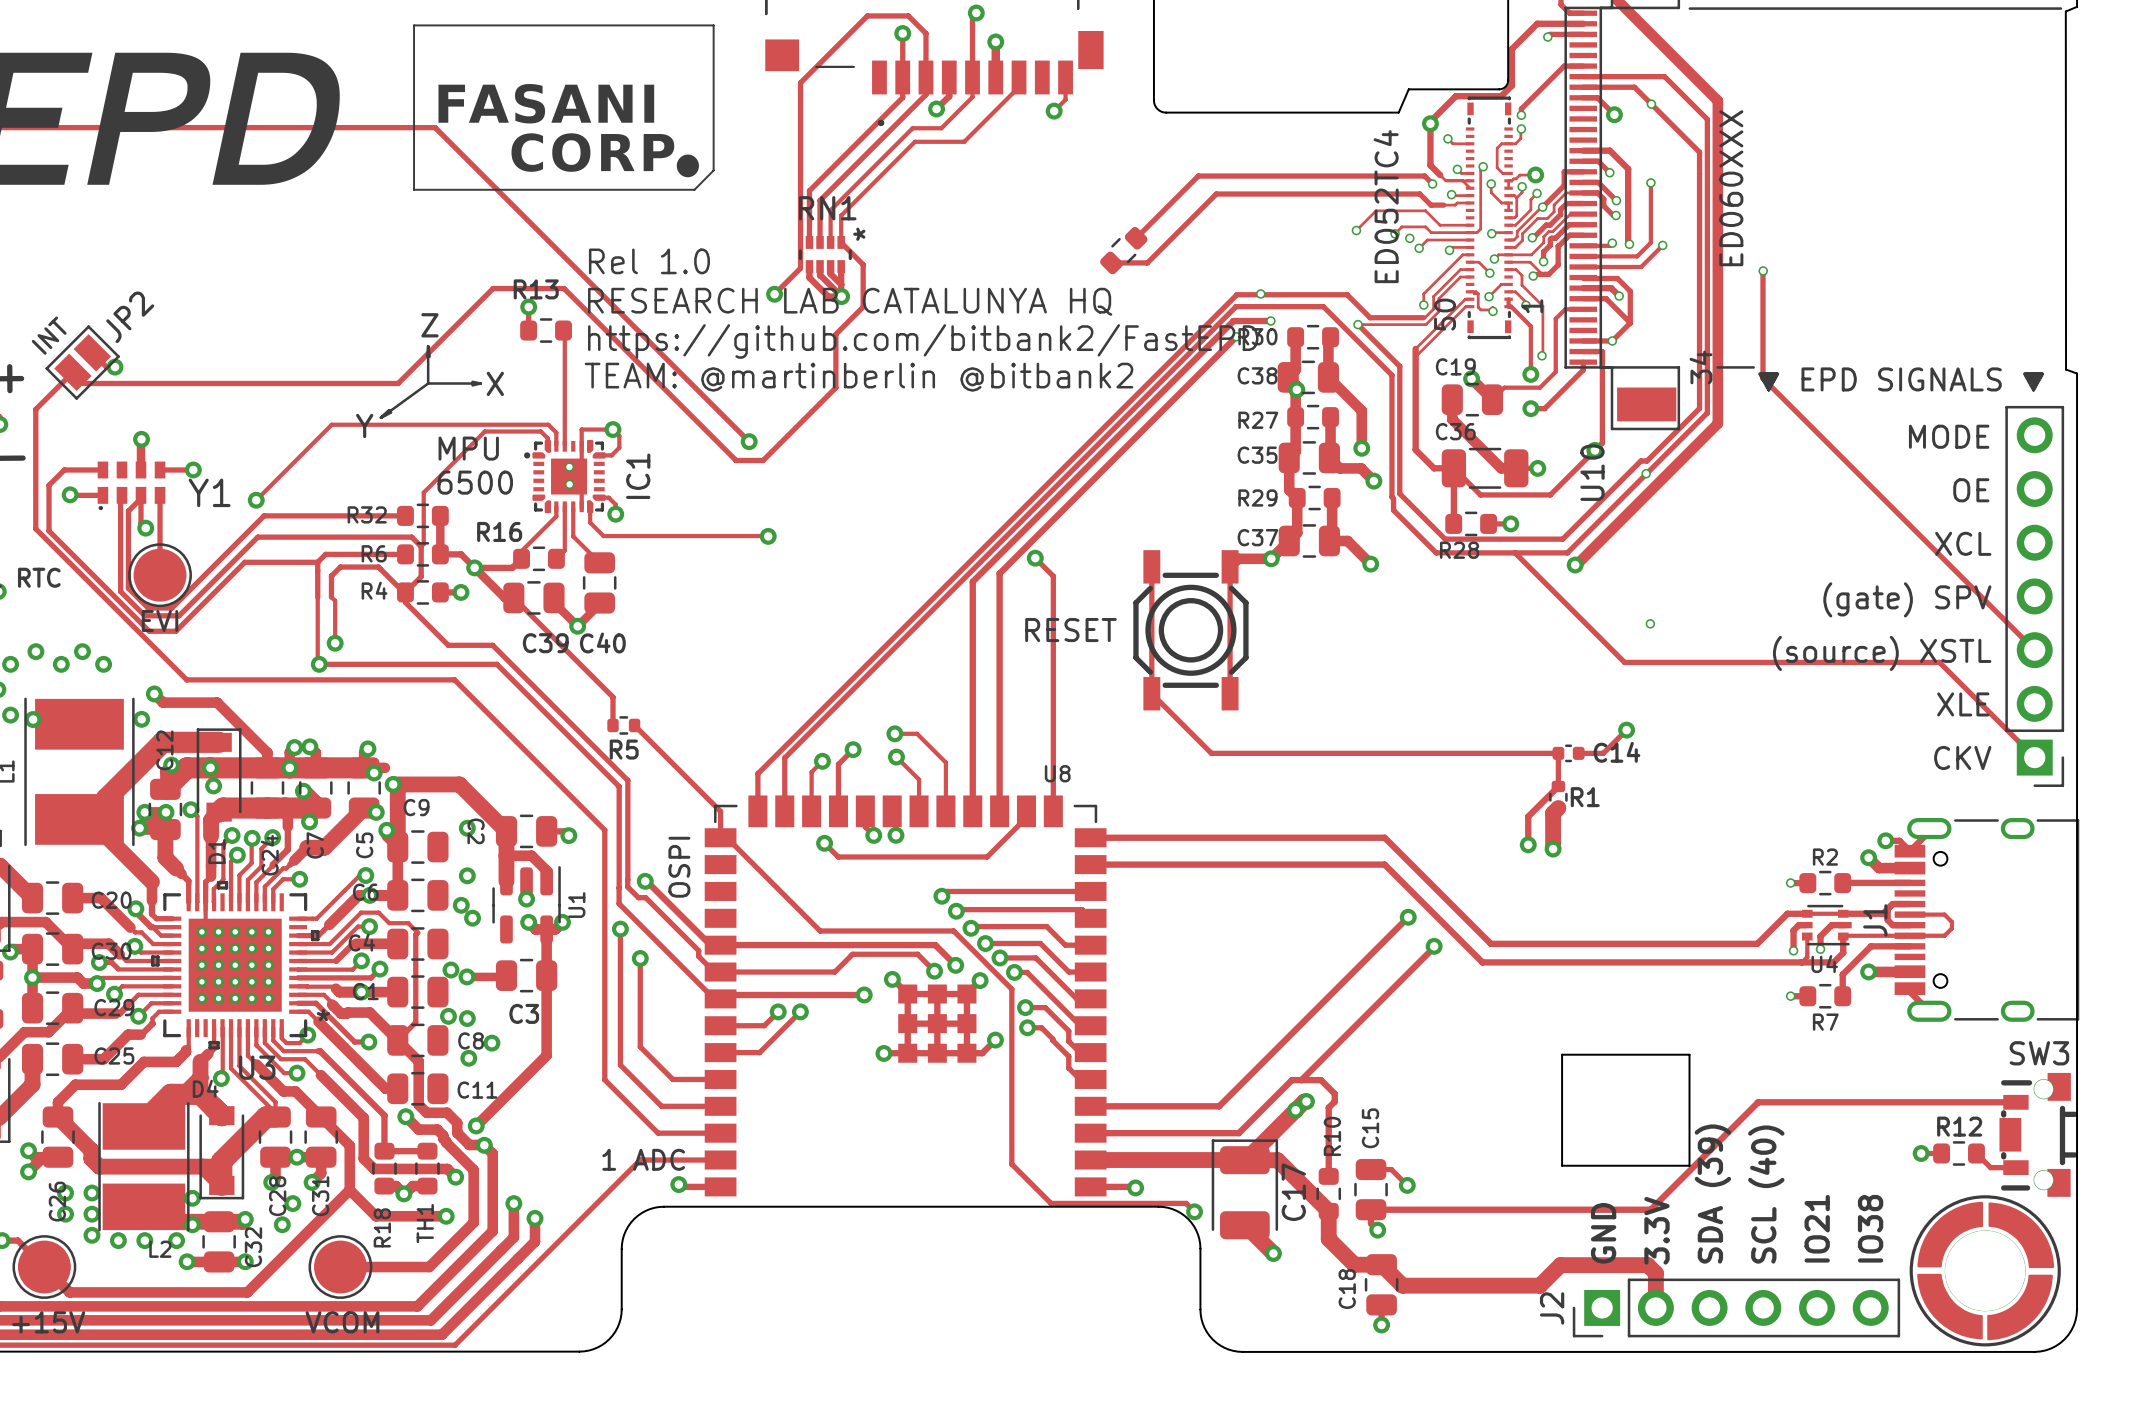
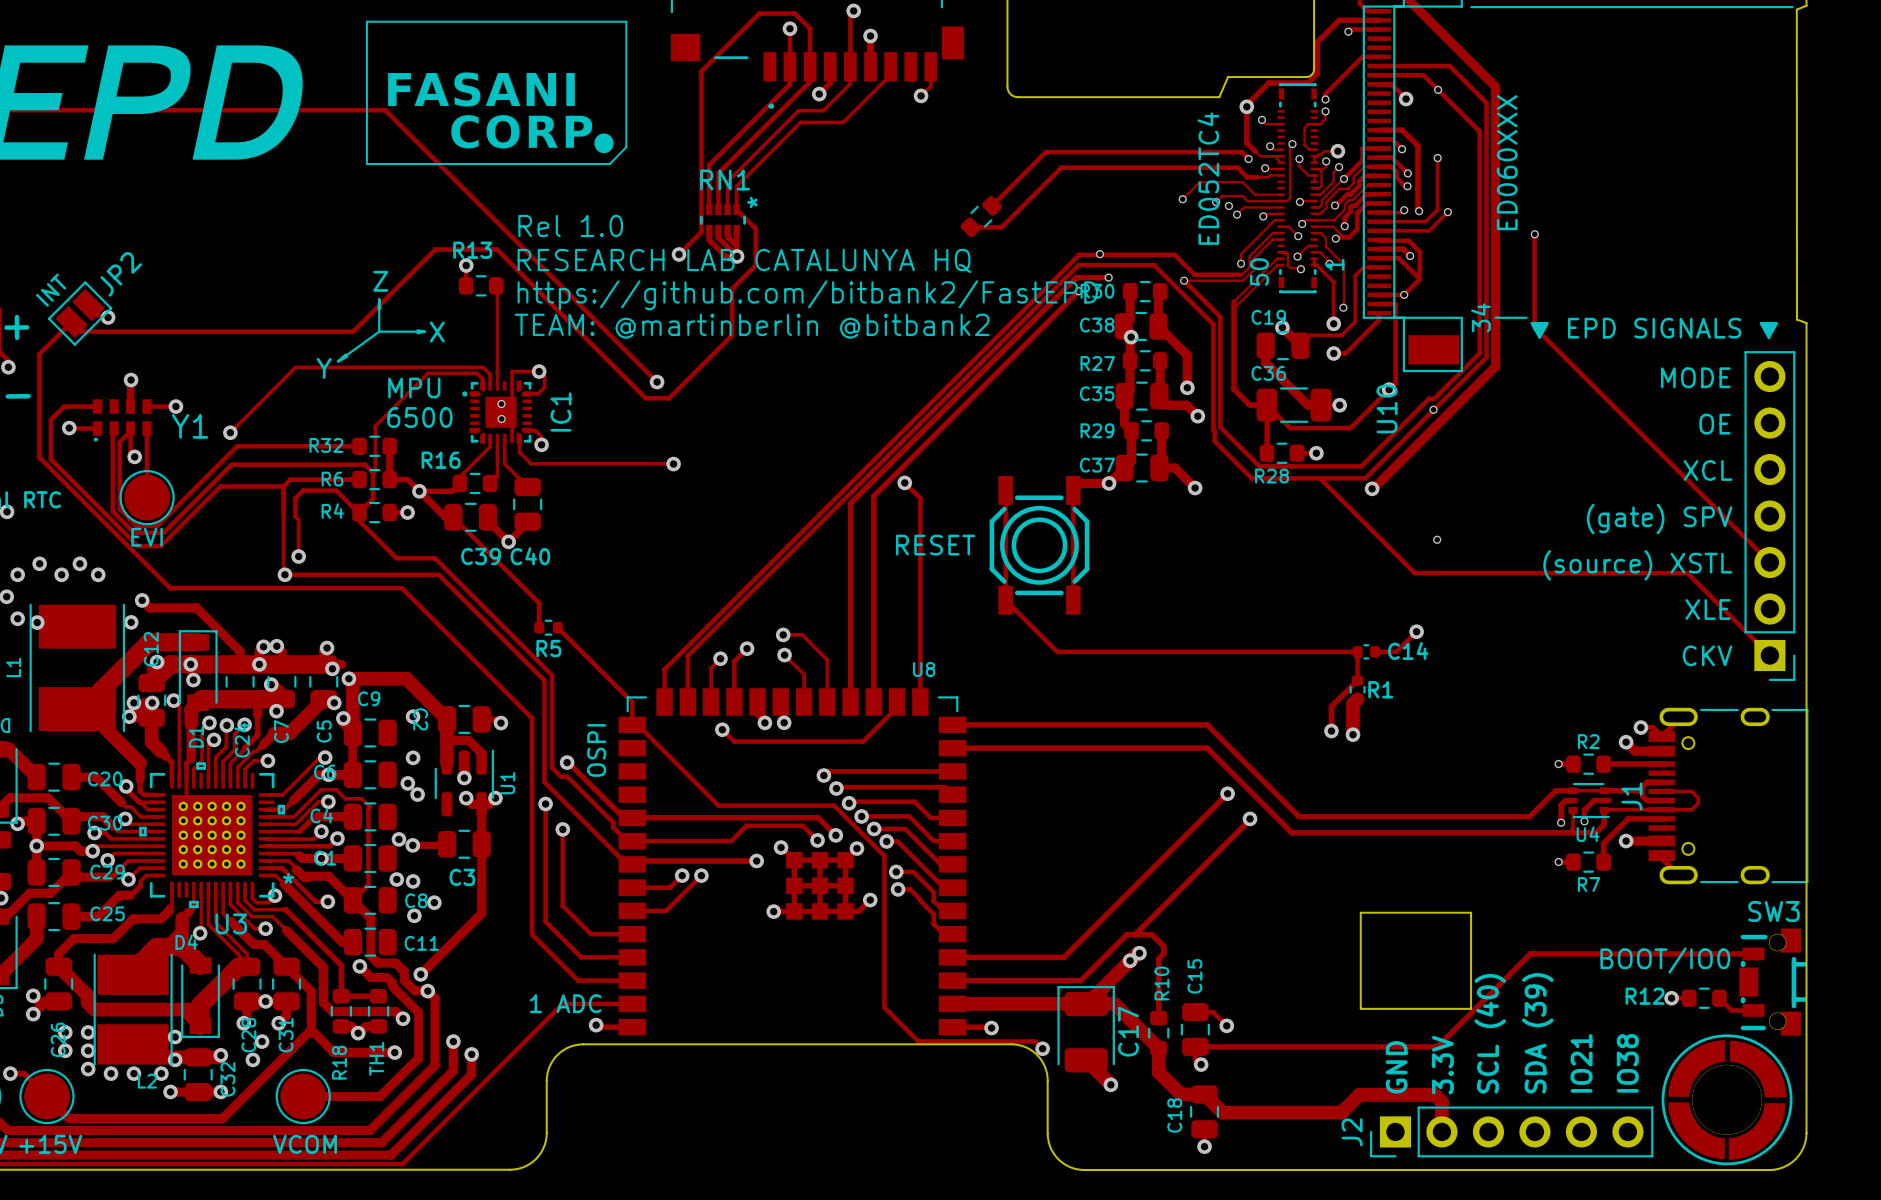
text: none -> BOOT/IO0 (1665, 960)
R12 name position: R12 (1959, 1126) -> R12 (1645, 996)
text: SDA (39) (1712, 1194) -> SCL (40) (1490, 1033)
text: SCL (40) (1766, 1194) -> SDA (39) (1537, 1033)

